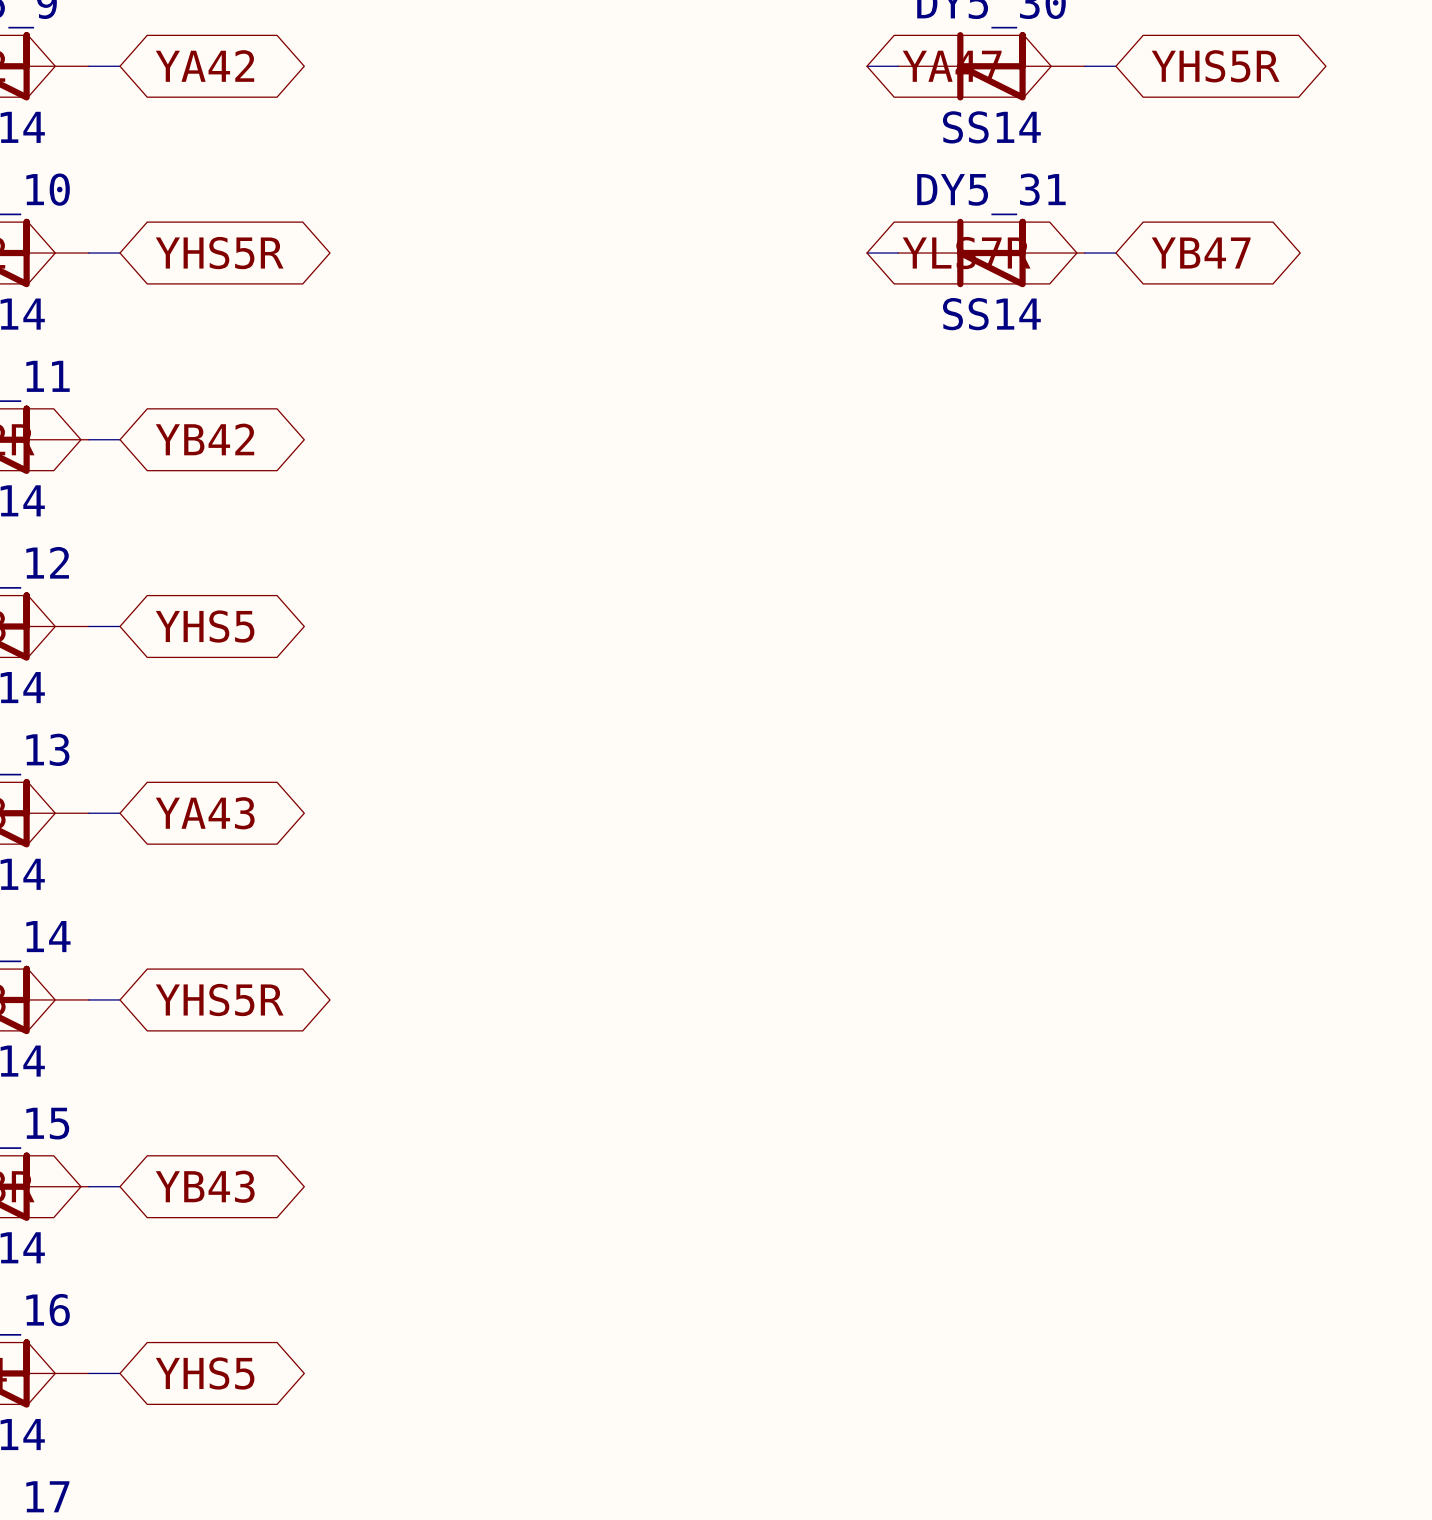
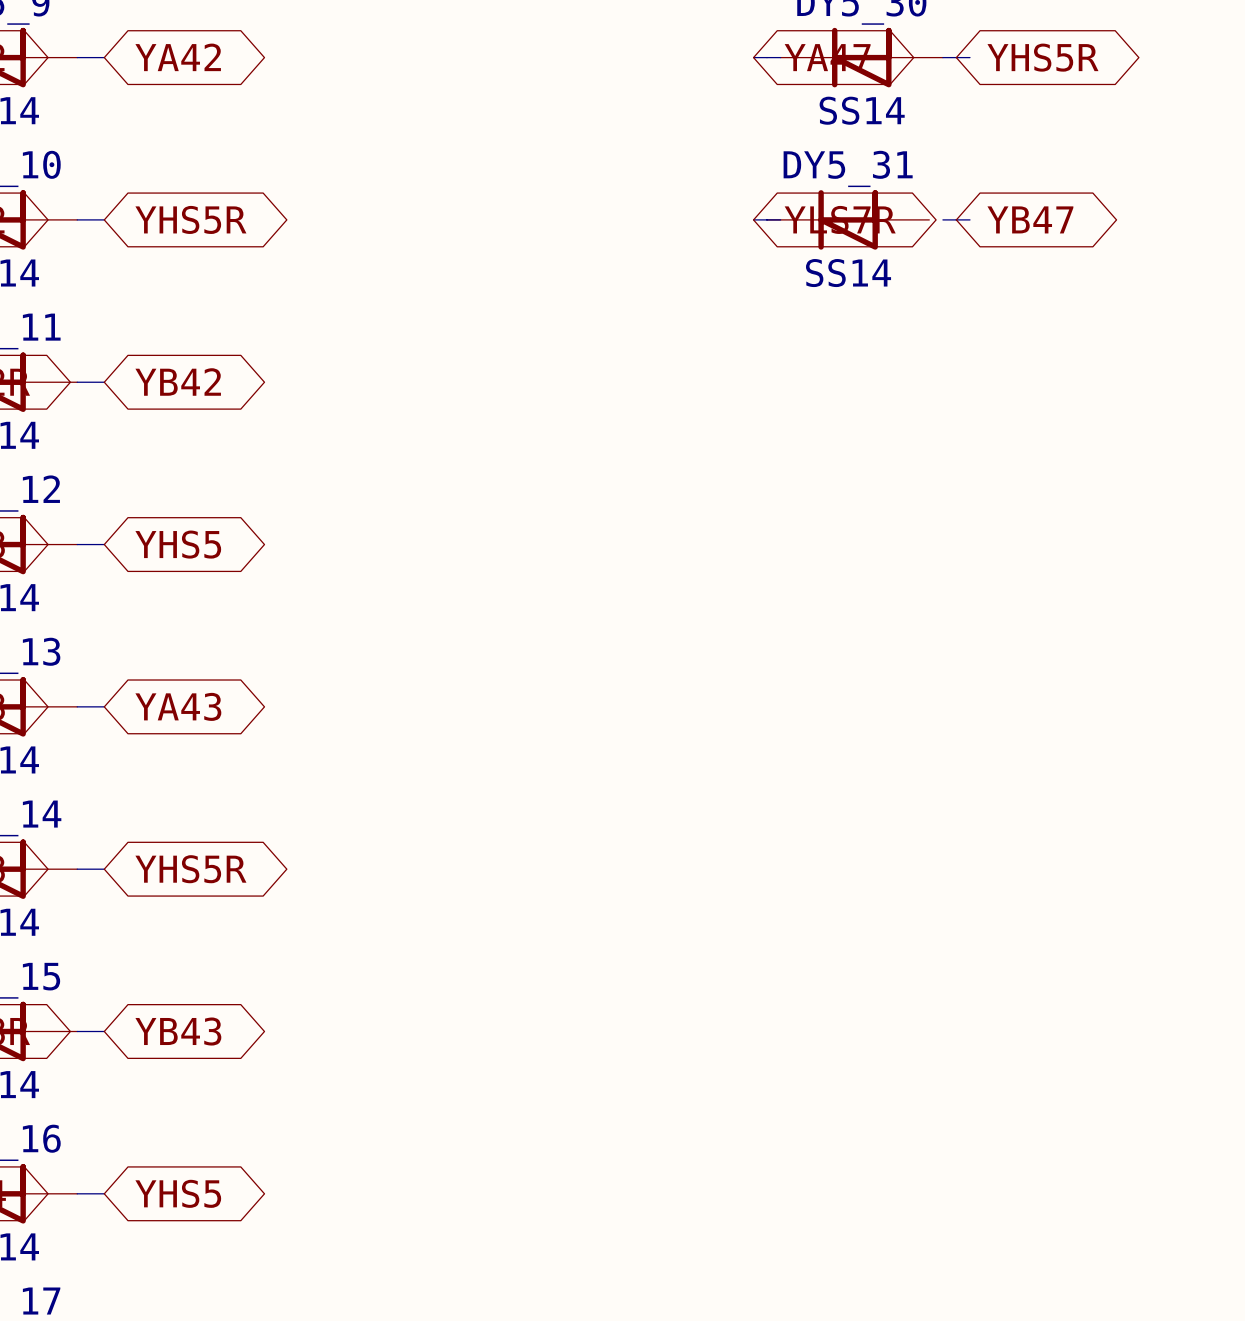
global label position: YHS5R (1215, 66) -> YHS5R (1042, 57)
DY5_31 position: (991, 253) -> (848, 219)
global label position: YB47 (1201, 253) -> YB47 (1030, 219)

